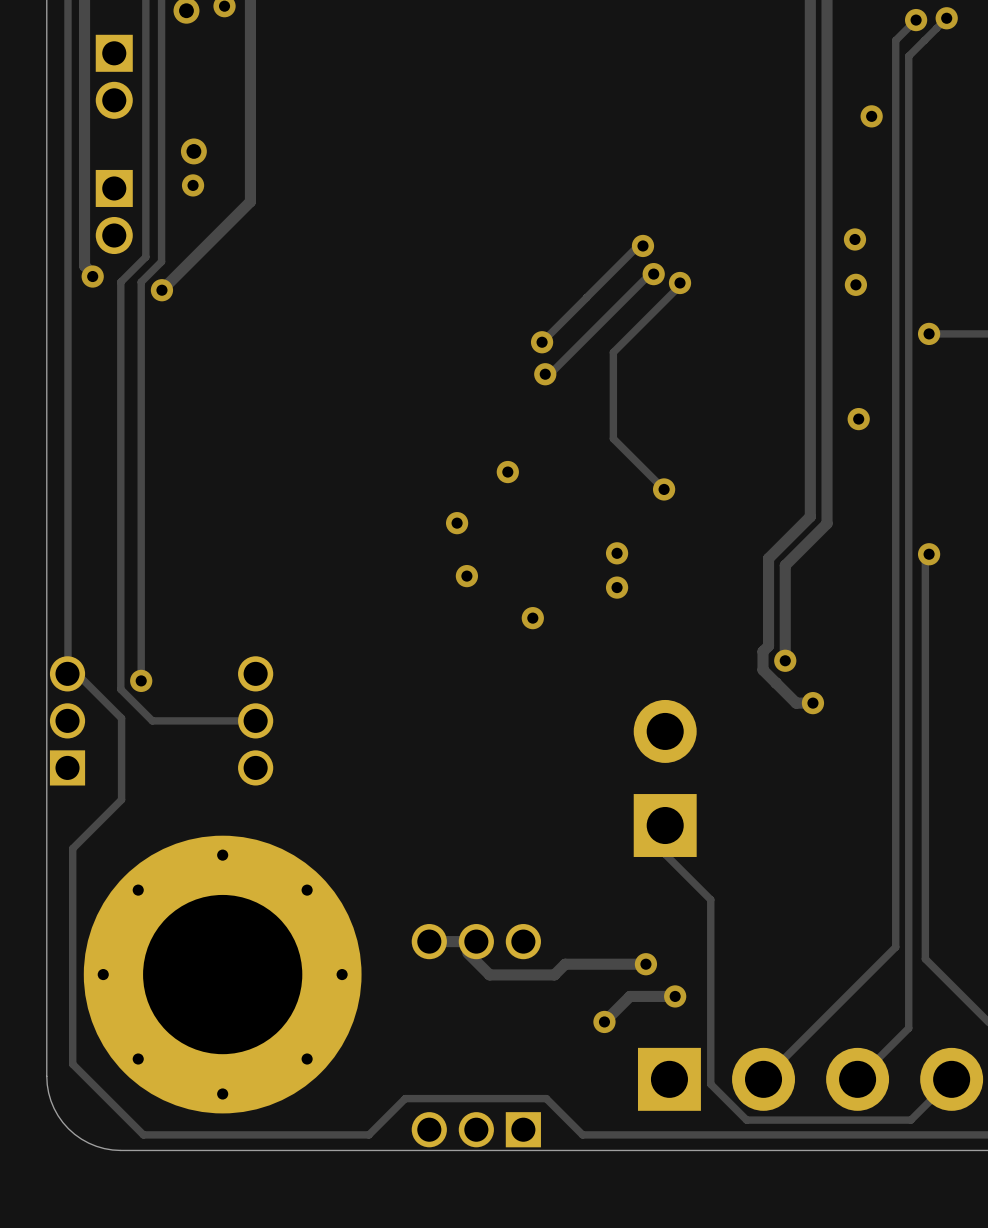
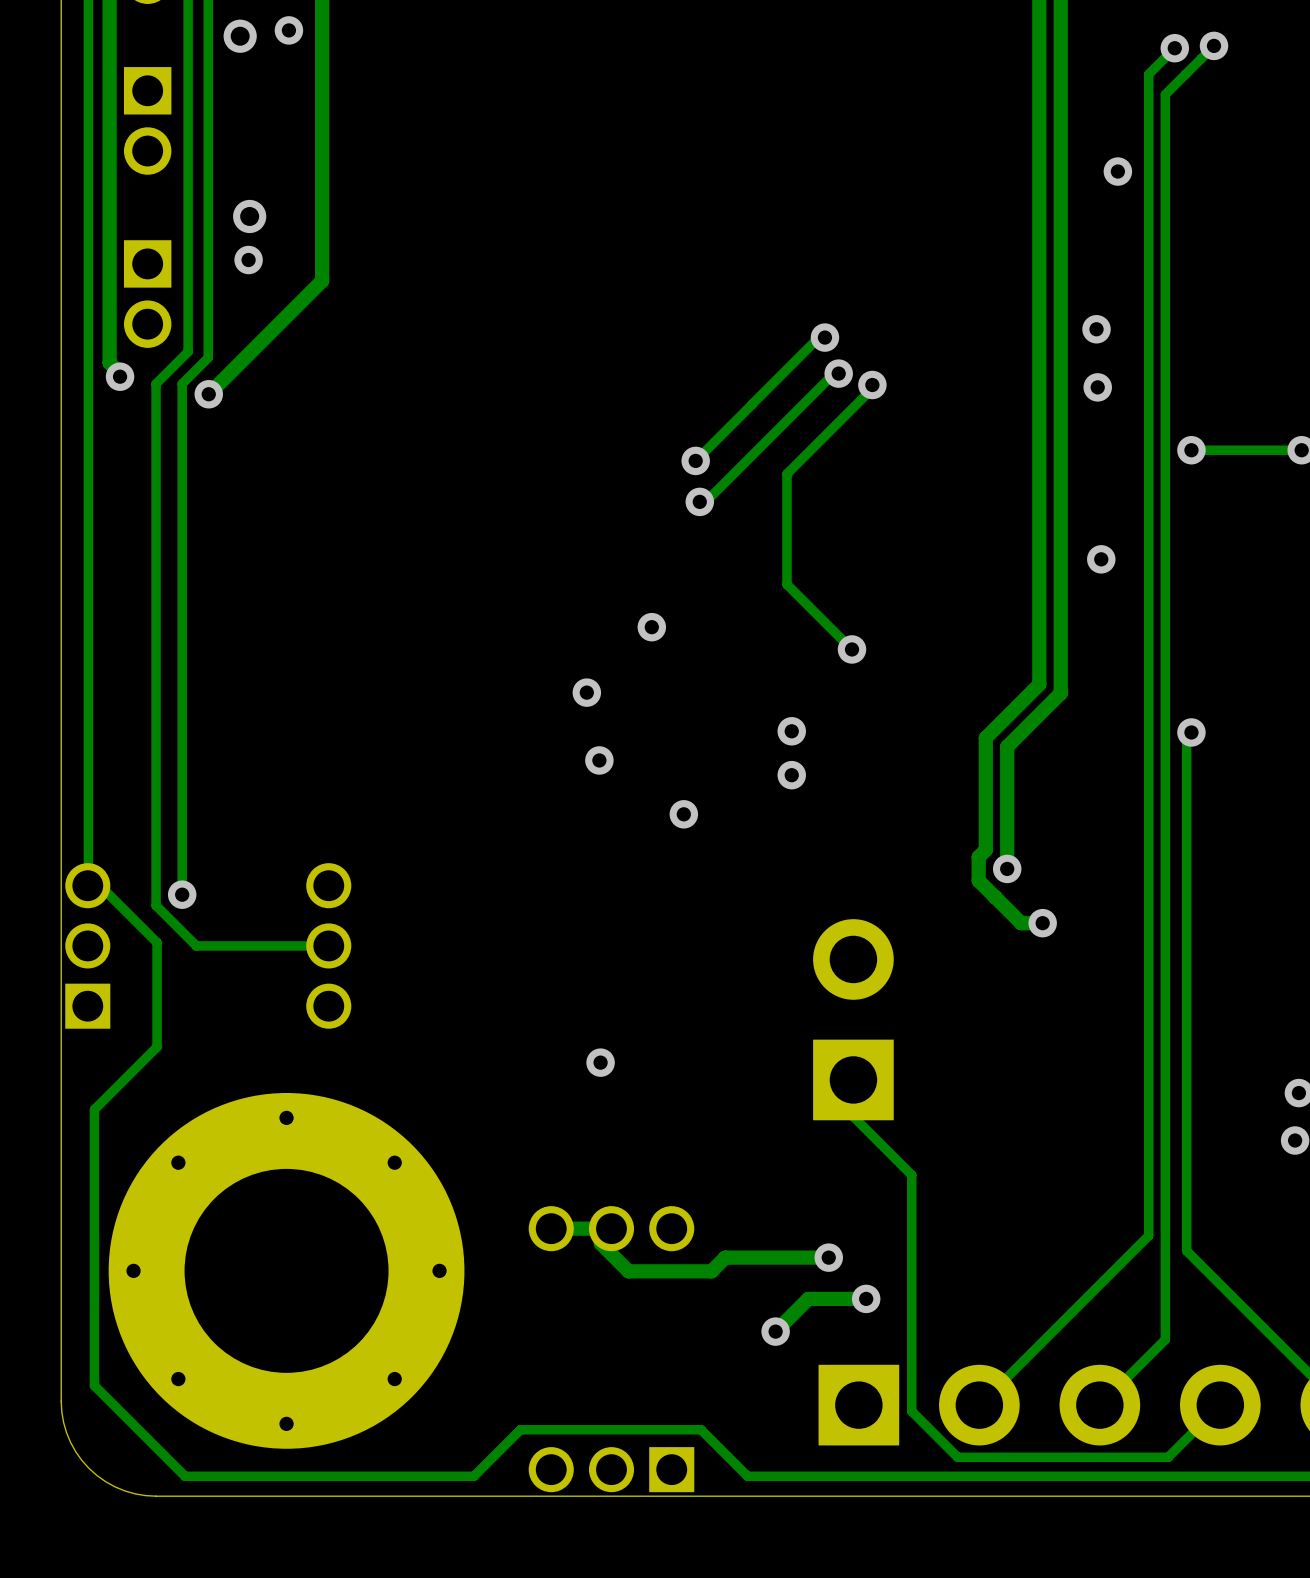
via: none -> (600, 1062)

